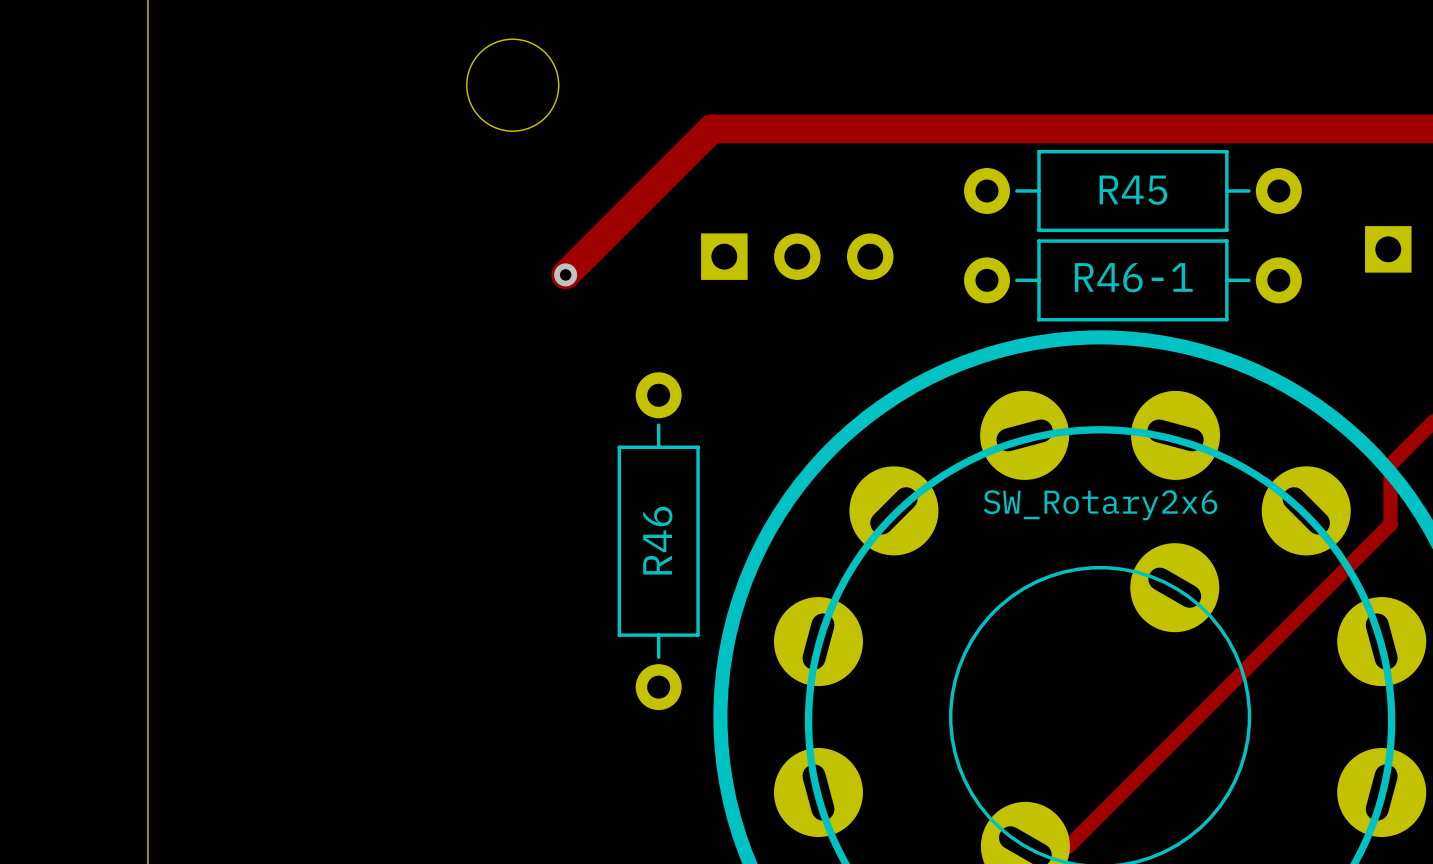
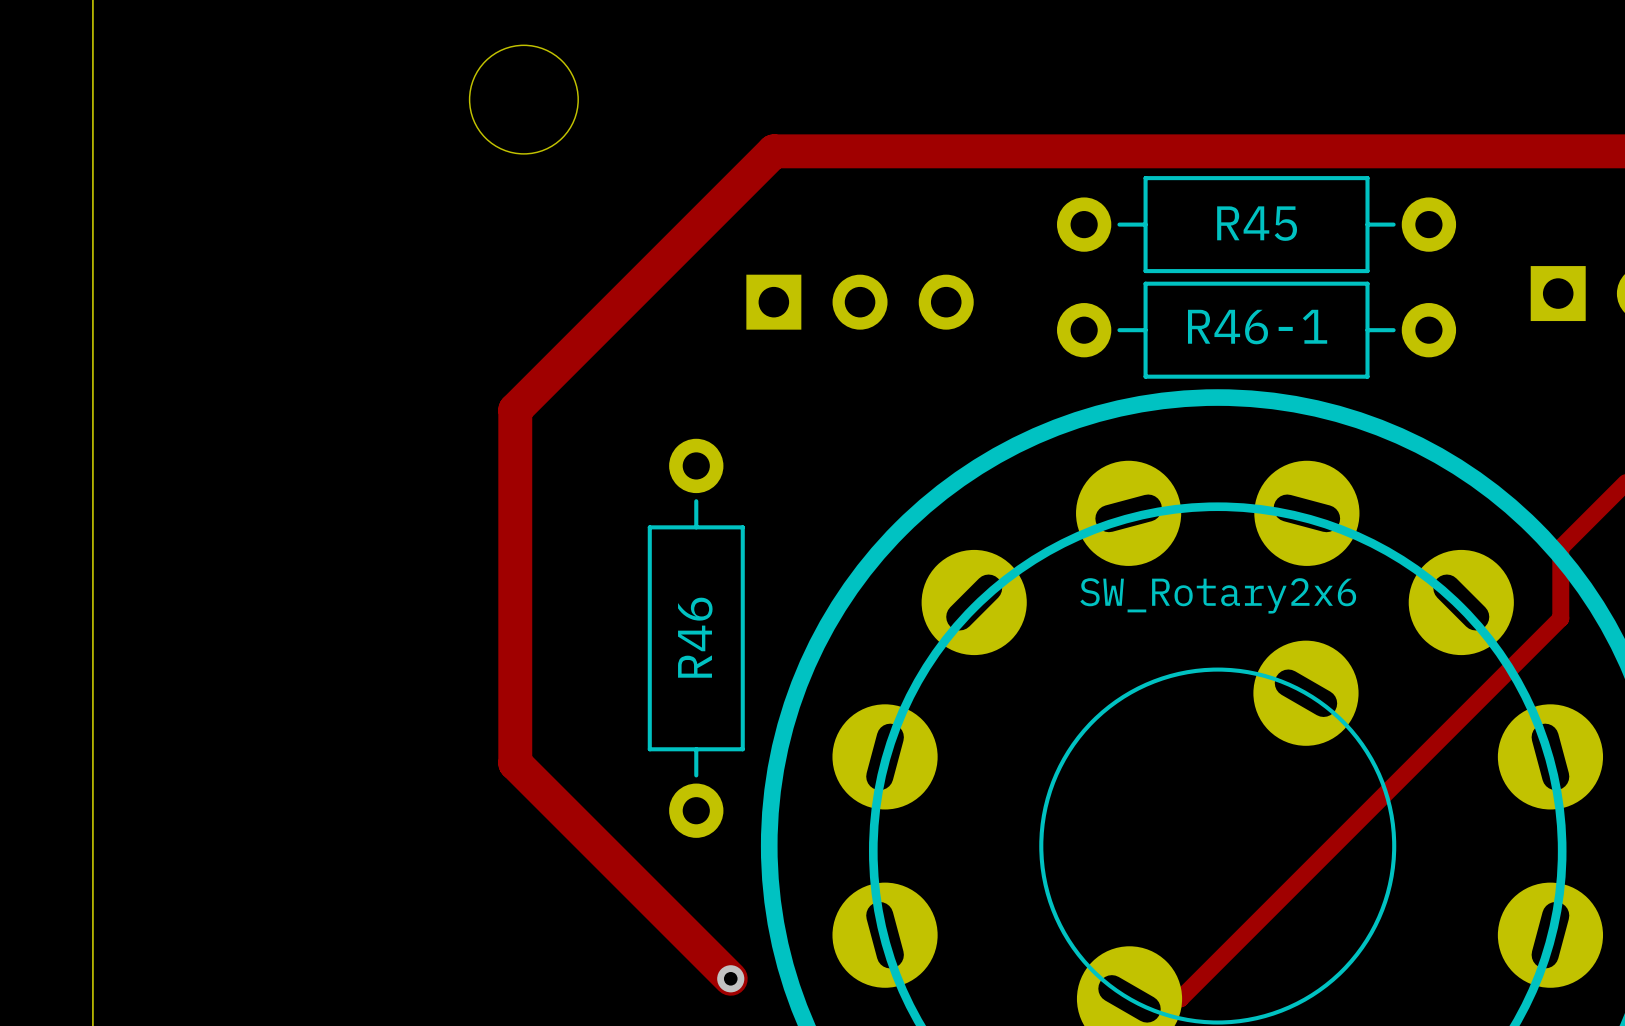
track: (724, 128) (711, 128) (565, 274) -> (773, 151) (515, 409) (515, 763) (730, 978)
via: (565, 274) -> none
via: none -> (730, 978)

